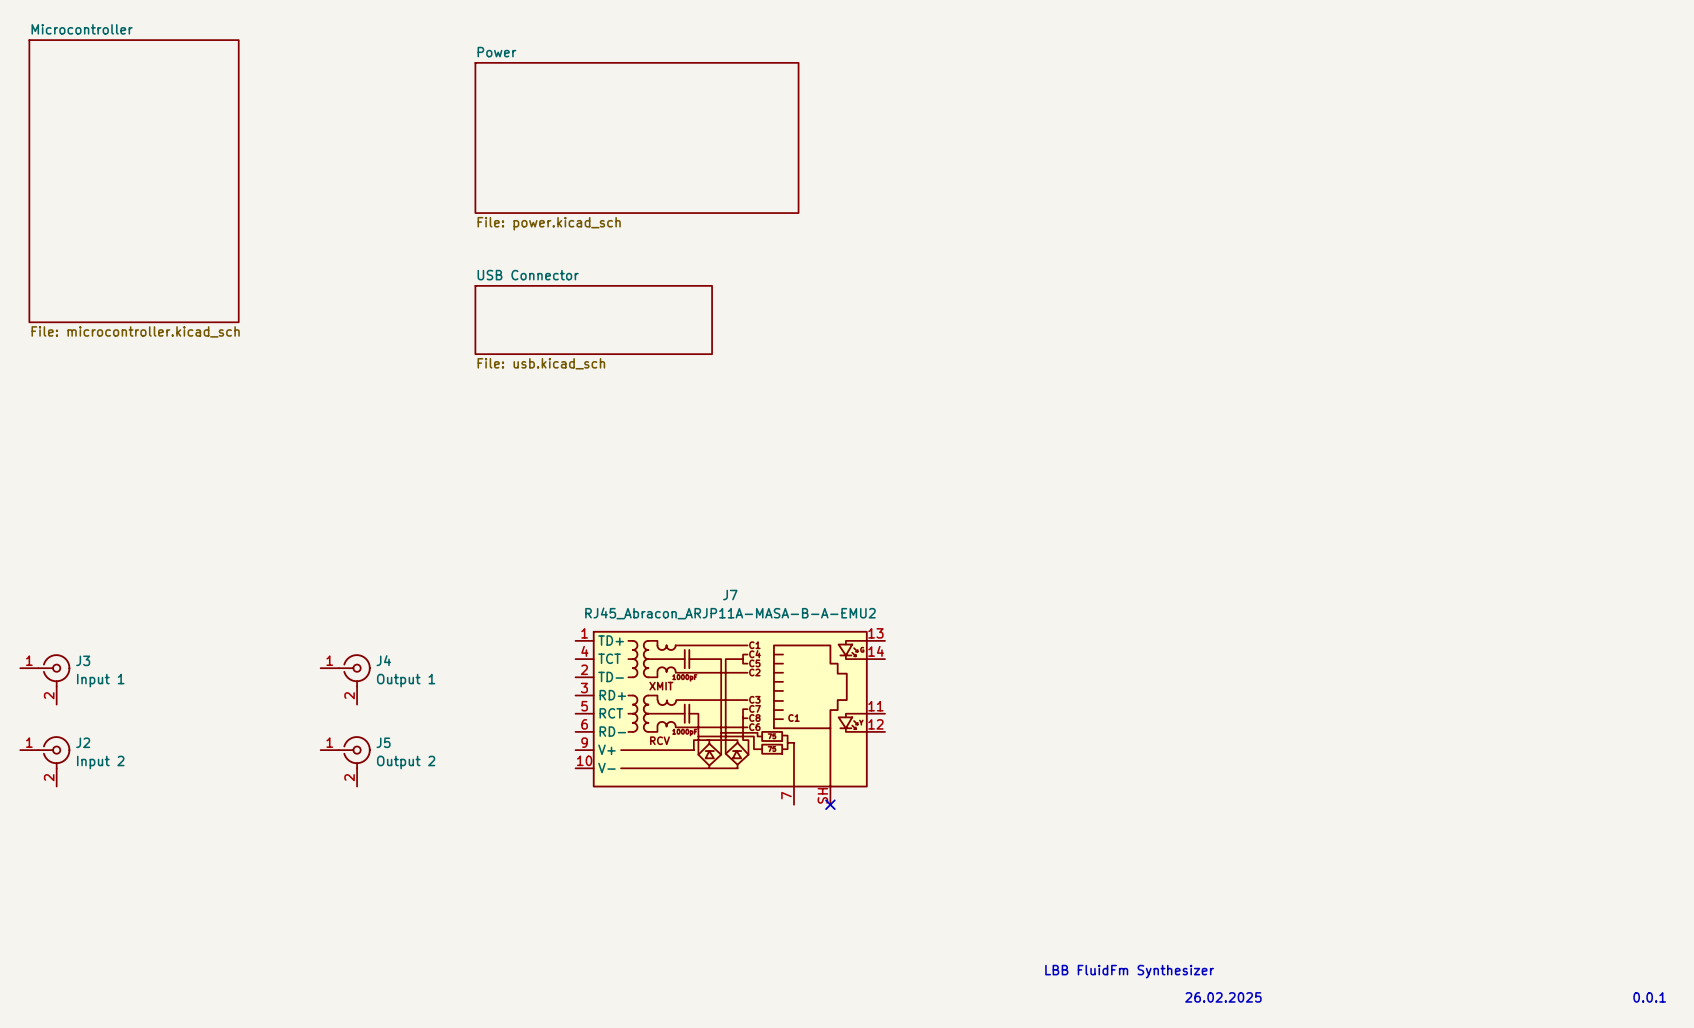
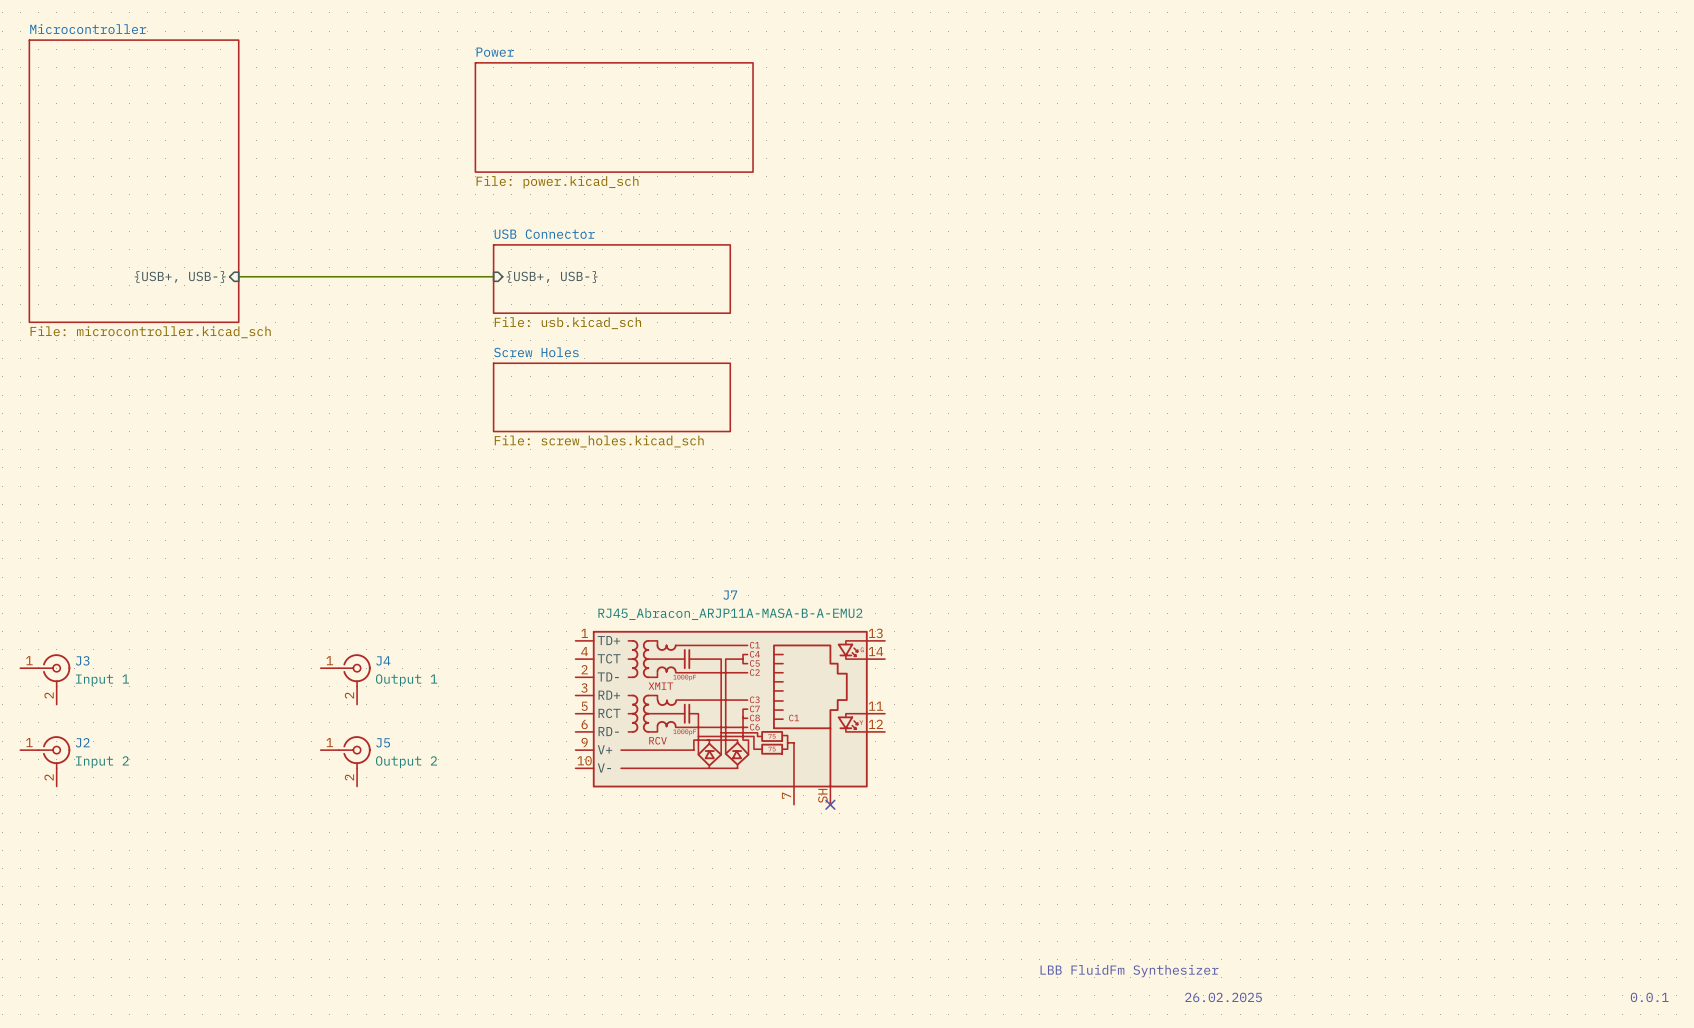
sheet Power: none -> File: power.kicad_sch (614, 117)
sheet Power: File: power.kicad_sch (636, 137) -> none
wire: none -> (238, 276) (493, 276)
sheet pin: none -> {USB+, USB-} (180, 276)
sheet pin: none -> {USB+, USB-} (552, 276)
sheet USB Connector position: (593, 320) -> (611, 279)
sheet Screw Holes: none -> File: screw_holes.kicad_sch (611, 397)

